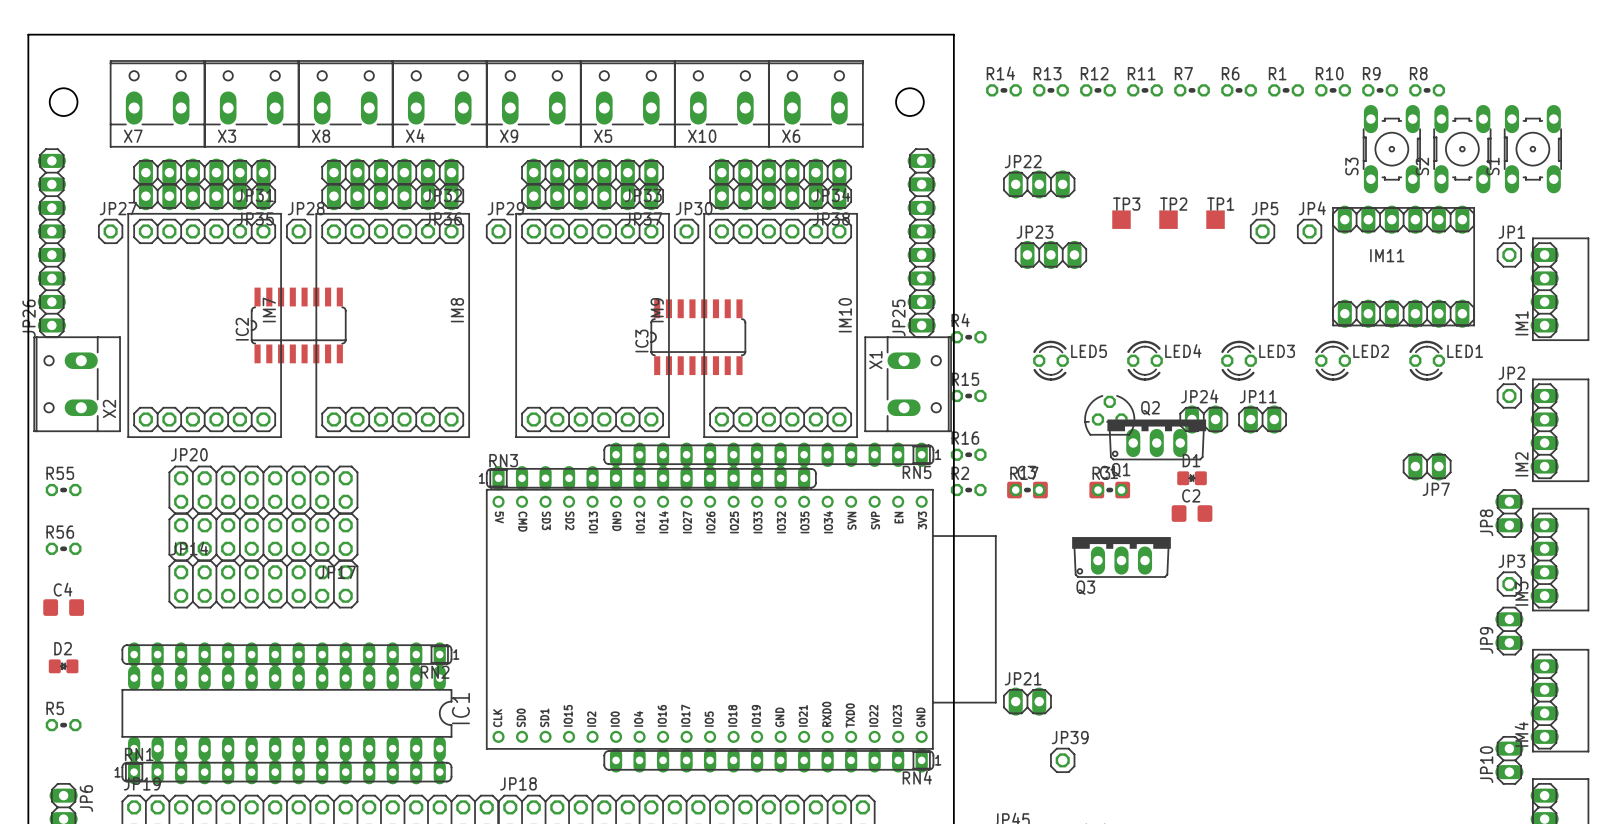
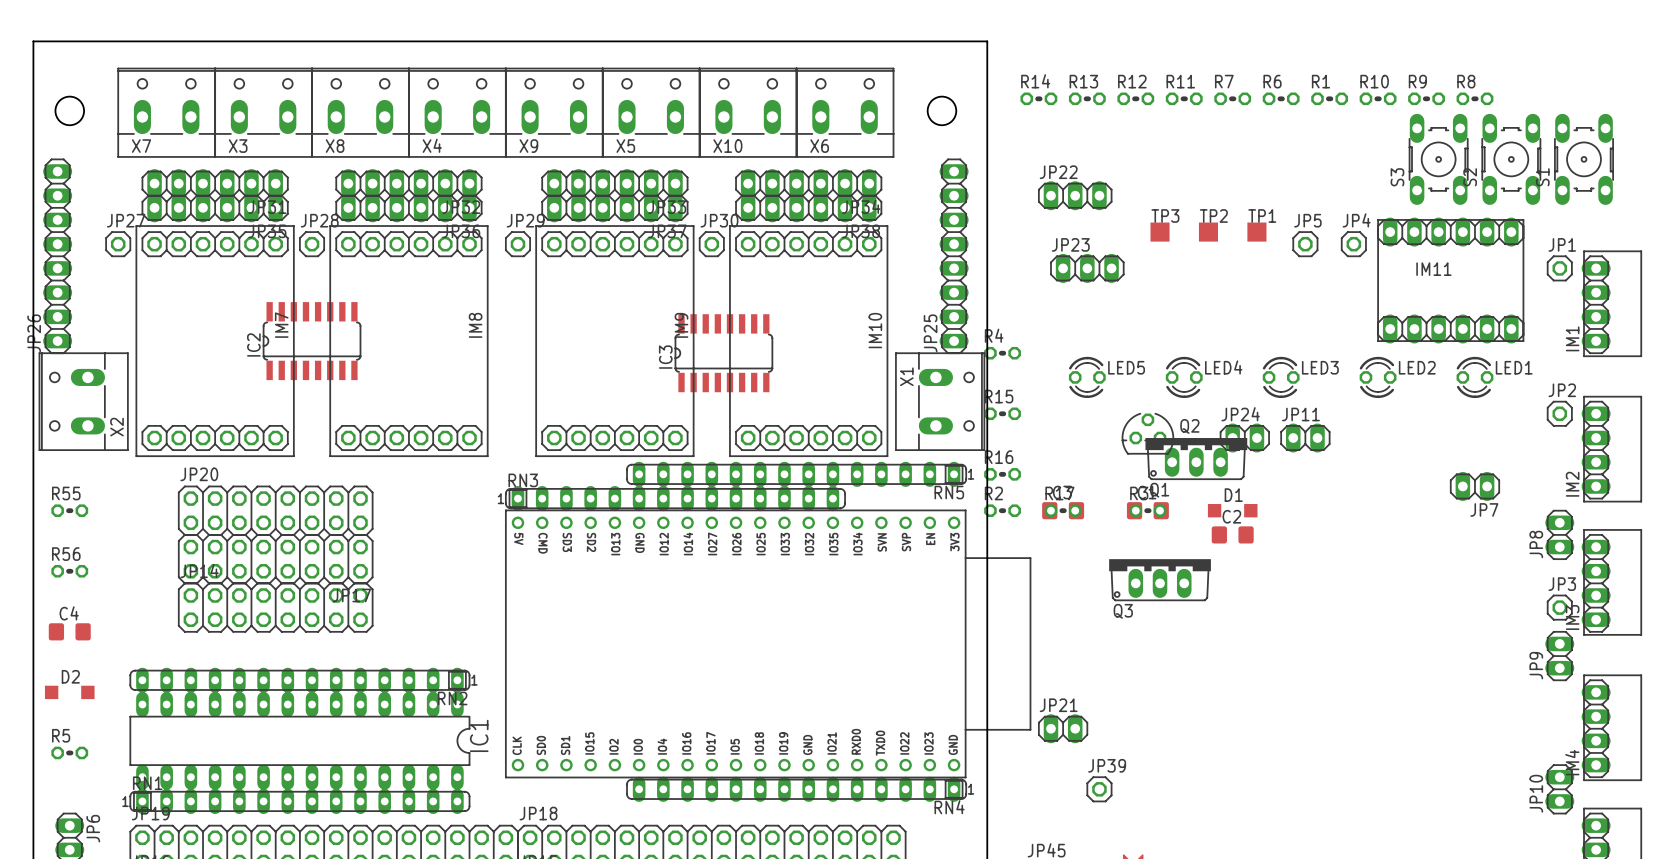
D1 footprint: [1177, 471, 1207, 486] -> [1207, 504, 1258, 518]
D2 footprint: [48, 659, 79, 674] -> [44, 685, 95, 700]

